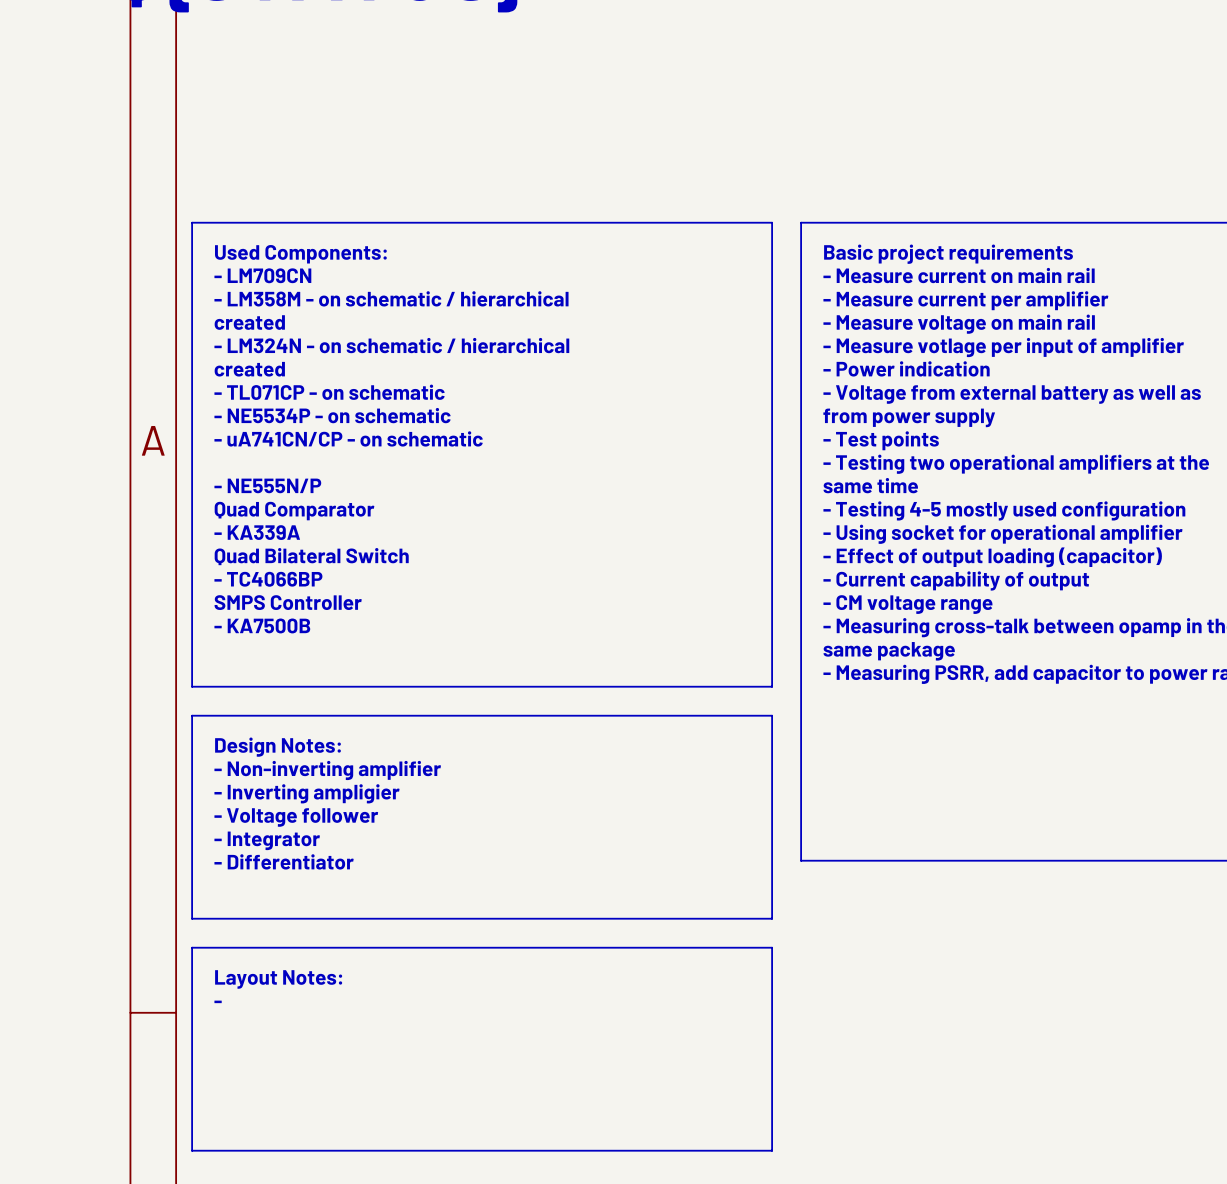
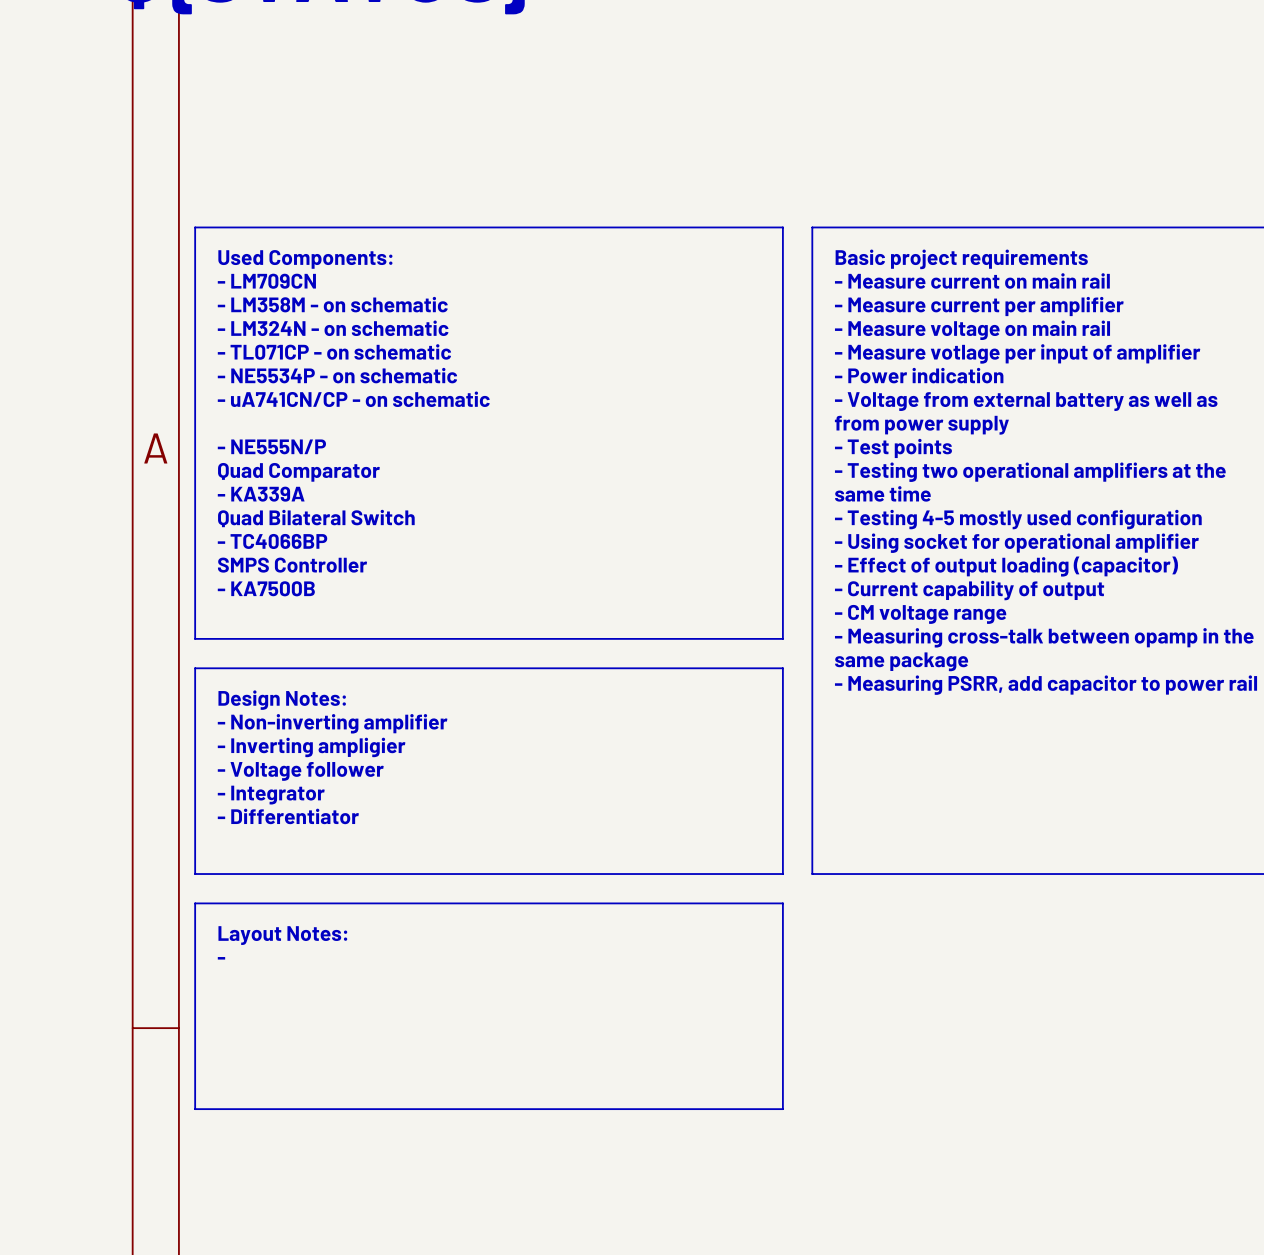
text: - LM358M - on schematic / hierarchical (391, 298) -> - LM358M - on schematic (332, 304)
text: created (249, 322) -> - LM324N - on schematic (333, 328)
text: - LM324N - on schematic / hierarchical (391, 345) -> - TL071CP - on schematic (334, 351)
text: created (249, 369) -> - NE5534P - on schematic (337, 375)
text: - TL071CP - on schematic (329, 392) -> - uA741CN/CP - on schematic (353, 399)
text: - NE5534P - on schematic (332, 415) -> none
text: - uA741CN/CP - on schematic (348, 438) -> - NE555N/P (271, 446)
text: none -> Quad Comparator (298, 472)
text: - NE555N/P (267, 485) -> - KA339A (261, 494)
text: Quad Comparator (294, 511) -> Quad Bilateral Switch (316, 518)
text: - KA339A (257, 532) -> - TC4066BP (272, 541)
text: Quad Bilateral Switch (311, 556) -> SMPS Controller (292, 565)
text: - TC4066BP (268, 579) -> - KA7500B (266, 588)
text: SMPS Controller (288, 602) -> none
text: - KA7500B (262, 625) -> none
line: (192, 628) (192, 657) -> (195, 638) (782, 638)
line: (772, 628) (772, 657) -> (195, 668) (782, 668)
line: (192, 686) (772, 686) -> (195, 697) (195, 727)
line: (192, 715) (772, 715) -> (782, 697) (782, 727)
text position: Design Notes: (277, 747) -> Design Notes: (282, 700)
text position: - Non-inverting amplifier (327, 770) -> - Non-inverting amplifier (332, 723)
text position: - Inverting ampligier (307, 793) -> - Inverting ampligier (311, 747)
text position: - Voltage follower (296, 817) -> - Voltage follower (300, 771)
text position: - Integrator (267, 840) -> - Integrator (271, 795)
line: (192, 860) (192, 889) -> (195, 874) (782, 874)
line: (772, 860) (772, 889) -> (195, 903) (782, 903)
text position: - Differentiator (284, 861) -> - Differentiator (288, 816)
line: (192, 918) (772, 918) -> (195, 932) (195, 962)
line: (192, 947) (772, 947) -> (782, 932) (782, 962)
text position: Layout Notes: (278, 979) -> Layout Notes: (282, 935)
text position: - (218, 1001) -> - (221, 958)
line: (192, 1092) (192, 1150) (772, 1150) (772, 1092) -> (195, 1109) (782, 1109)

